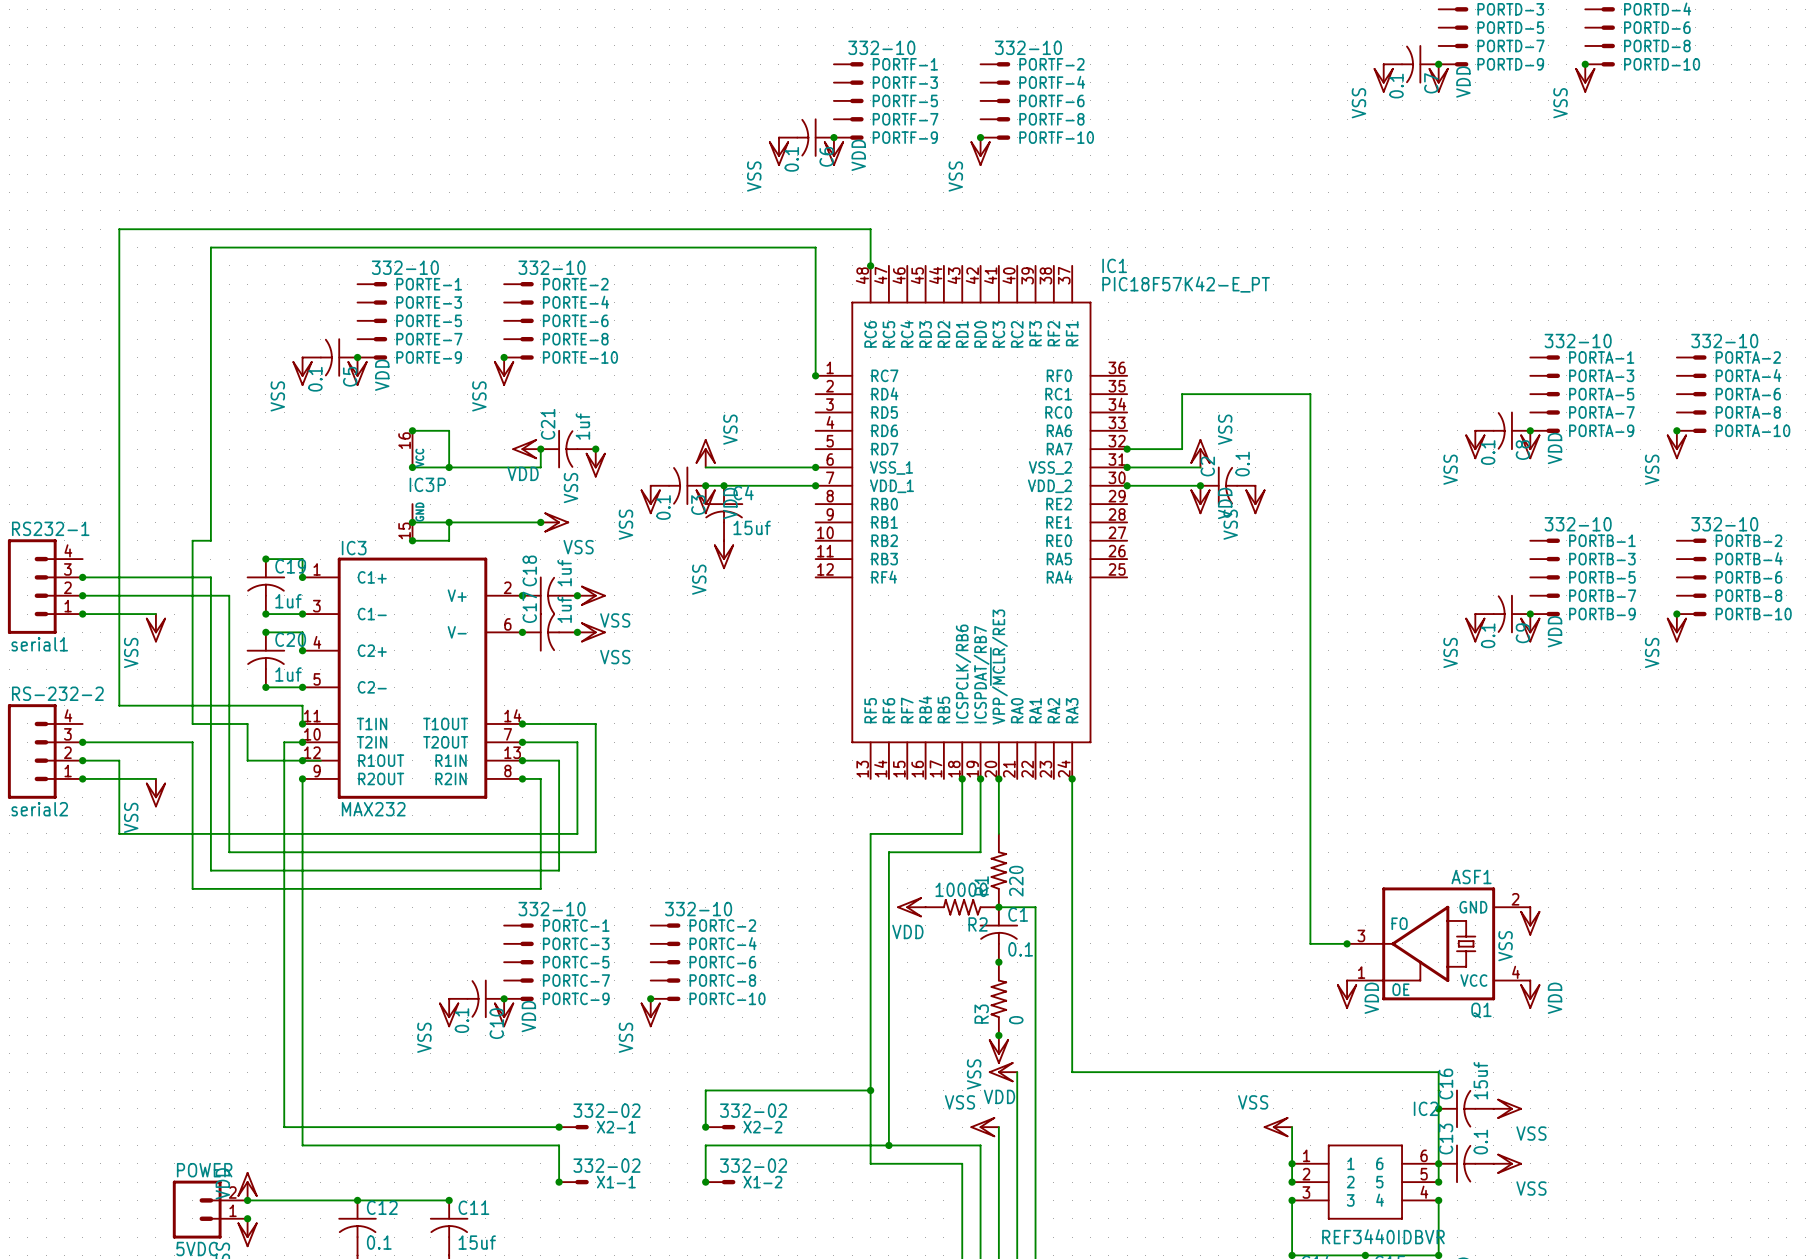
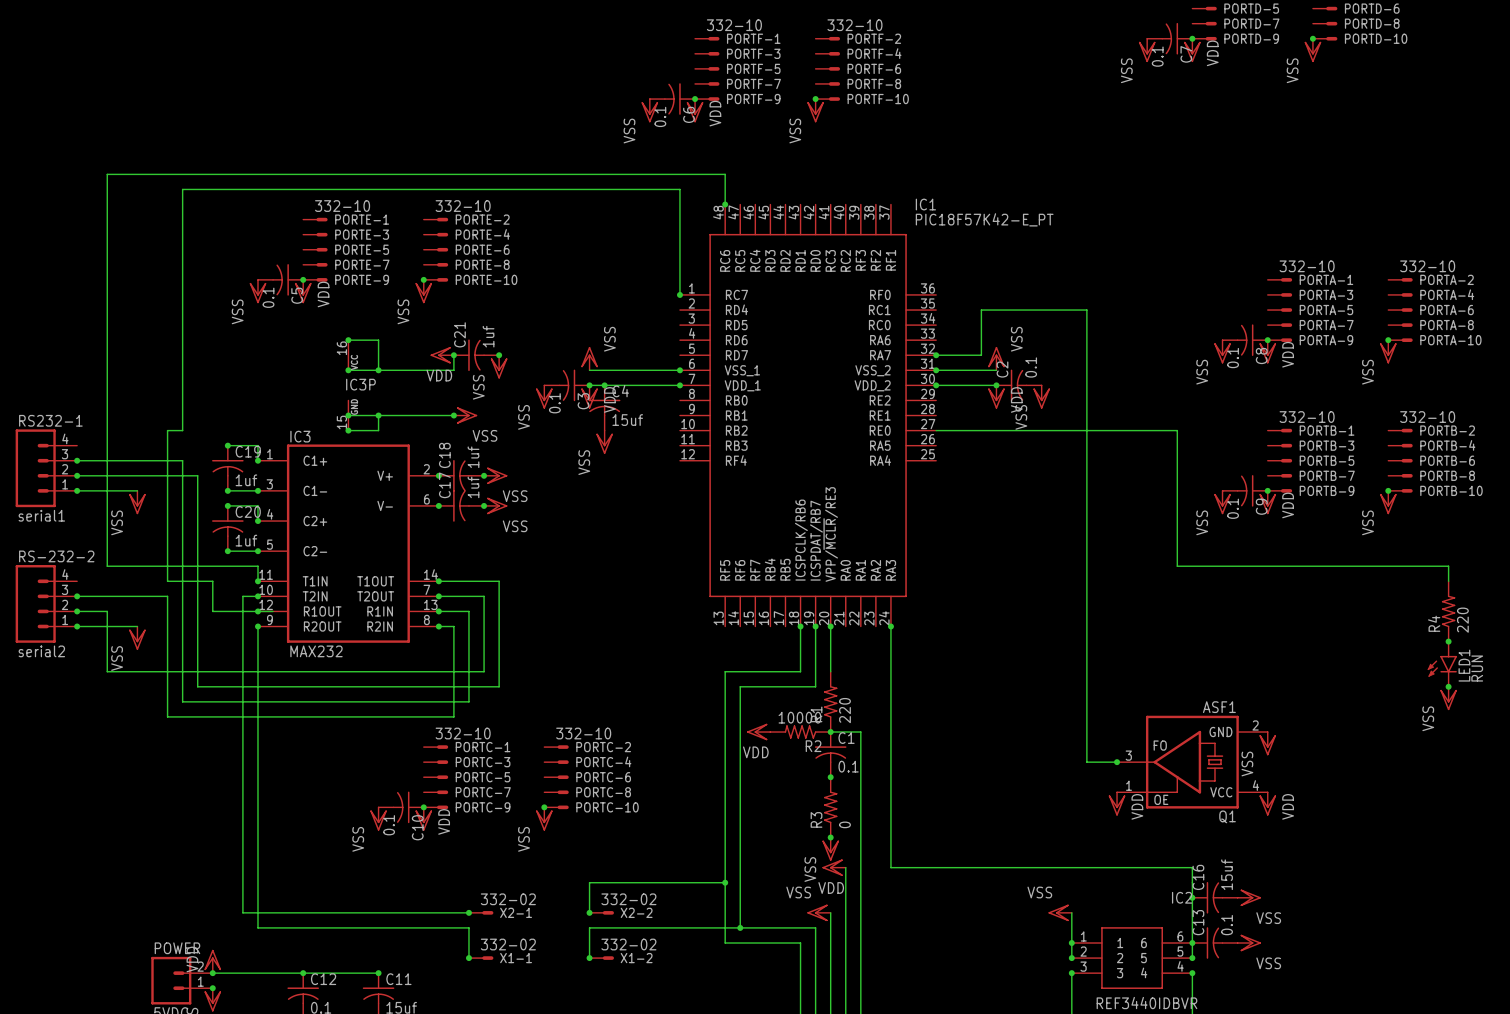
wire: none -> (936, 430) (1177, 430) (1177, 566) (1448, 566) (1448, 581)
R4: none -> 220 (1448, 611)
junction: none -> (1448, 641)
LED1: none -> RUN (1442, 664)
junction: none -> (1448, 686)
power symbol: none -> VSS (1448, 698)

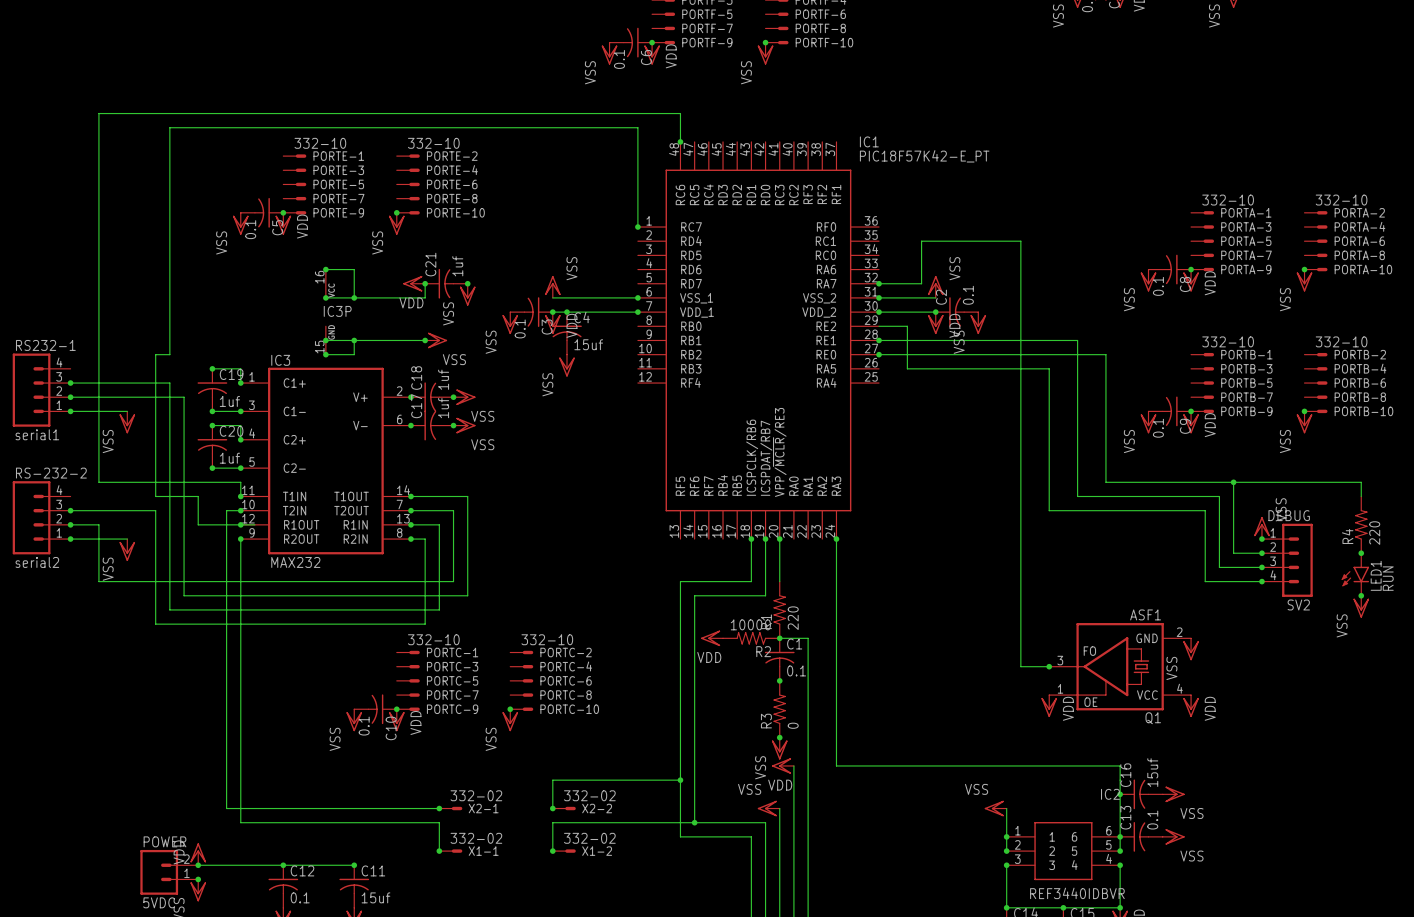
wire: none -> (879, 326) (907, 326) (907, 368) (1049, 368) (1049, 510) (1205, 510) (1205, 581) (1261, 581)
wire: none -> (879, 340) (1077, 340) (1077, 496) (1219, 496) (1219, 567) (1261, 567)
junction: none -> (879, 340)
junction: none -> (879, 354)
wire: none -> (1233, 482) (1233, 553) (1261, 553)
junction: none -> (1233, 482)
power symbol: none -> VSS (1261, 528)
junction: none -> (1261, 539)
junction: none -> (1261, 553)
SV2: none -> DEBUG (1287, 560)
junction: none -> (1261, 567)
junction: none -> (1261, 581)

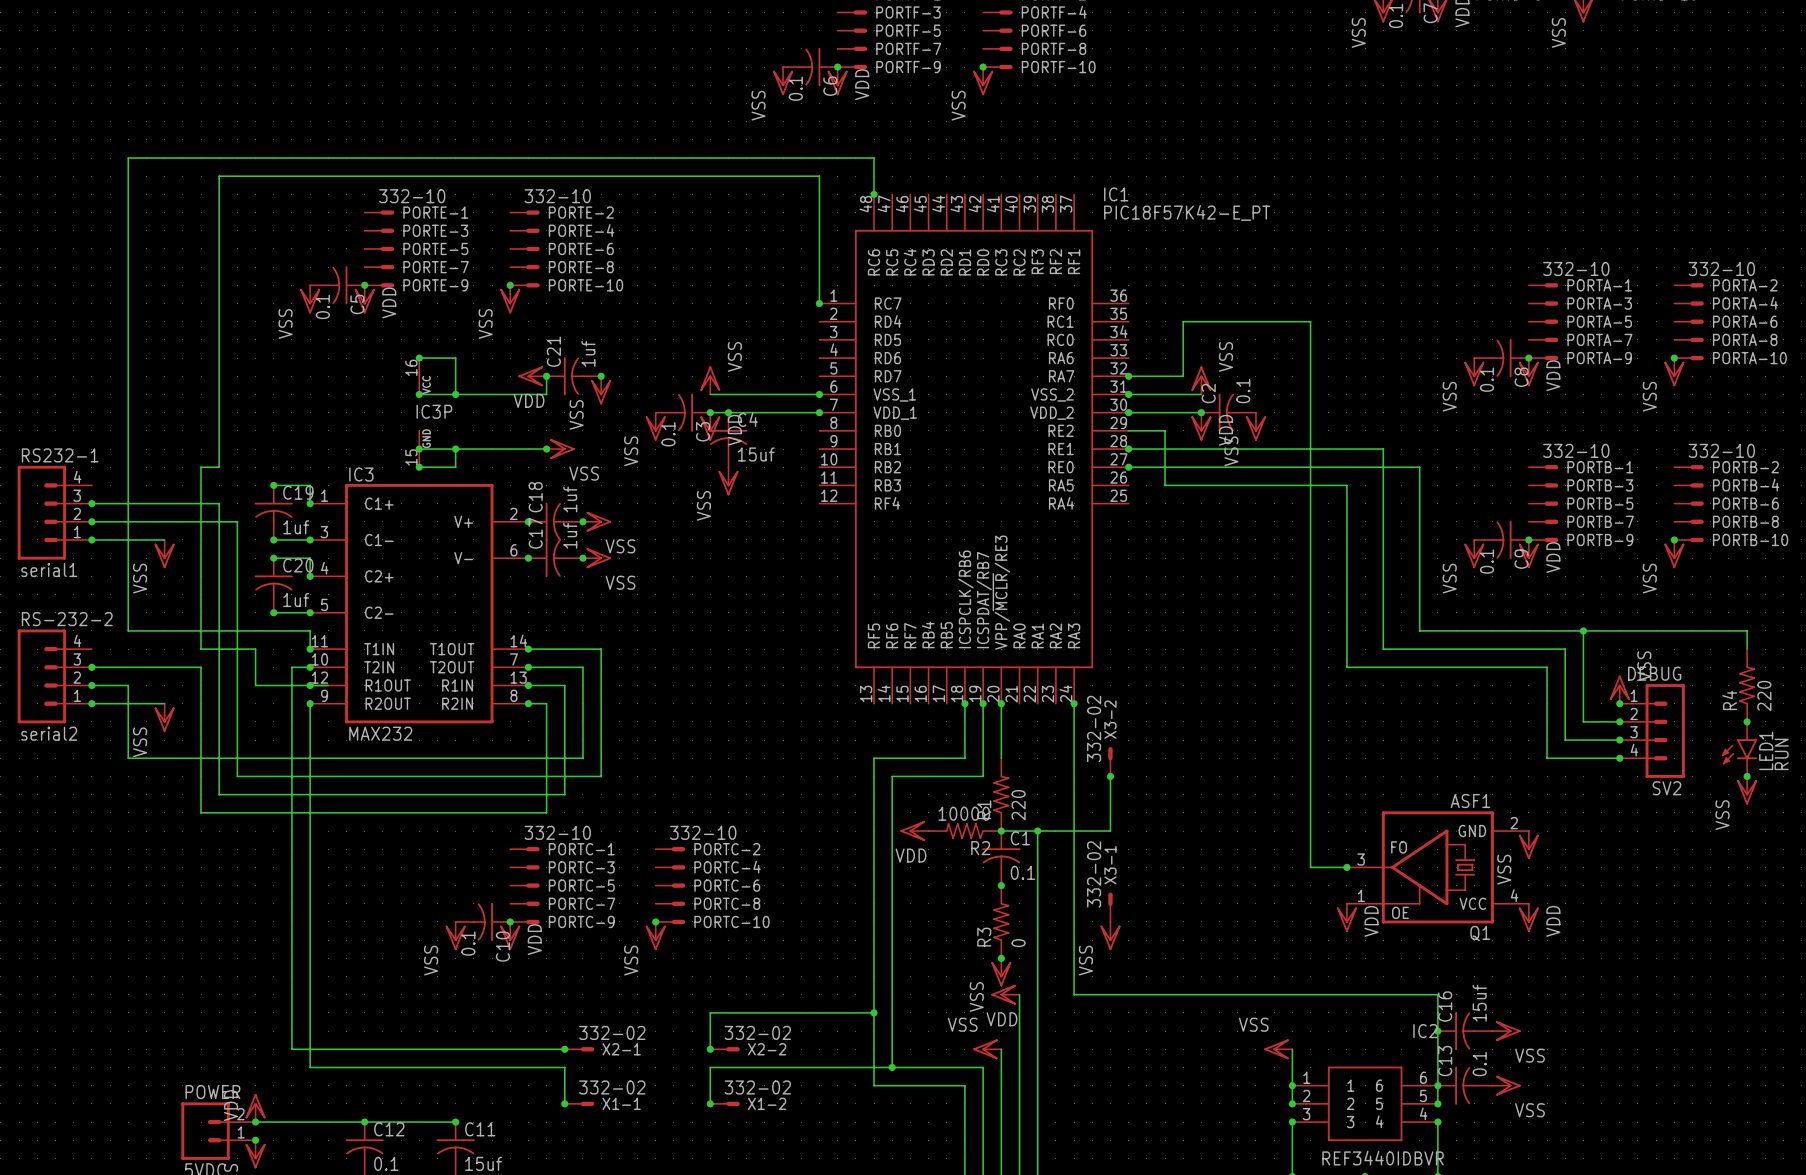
X3-2: none -> 332-02 (1110, 761)
wire: none -> (1110, 776) (1110, 831) (1037, 831)
junction: none -> (1110, 776)
junction: none -> (1037, 831)
X3-1: none -> 332-02 (1110, 907)
power symbol: none -> VSS (1110, 936)

